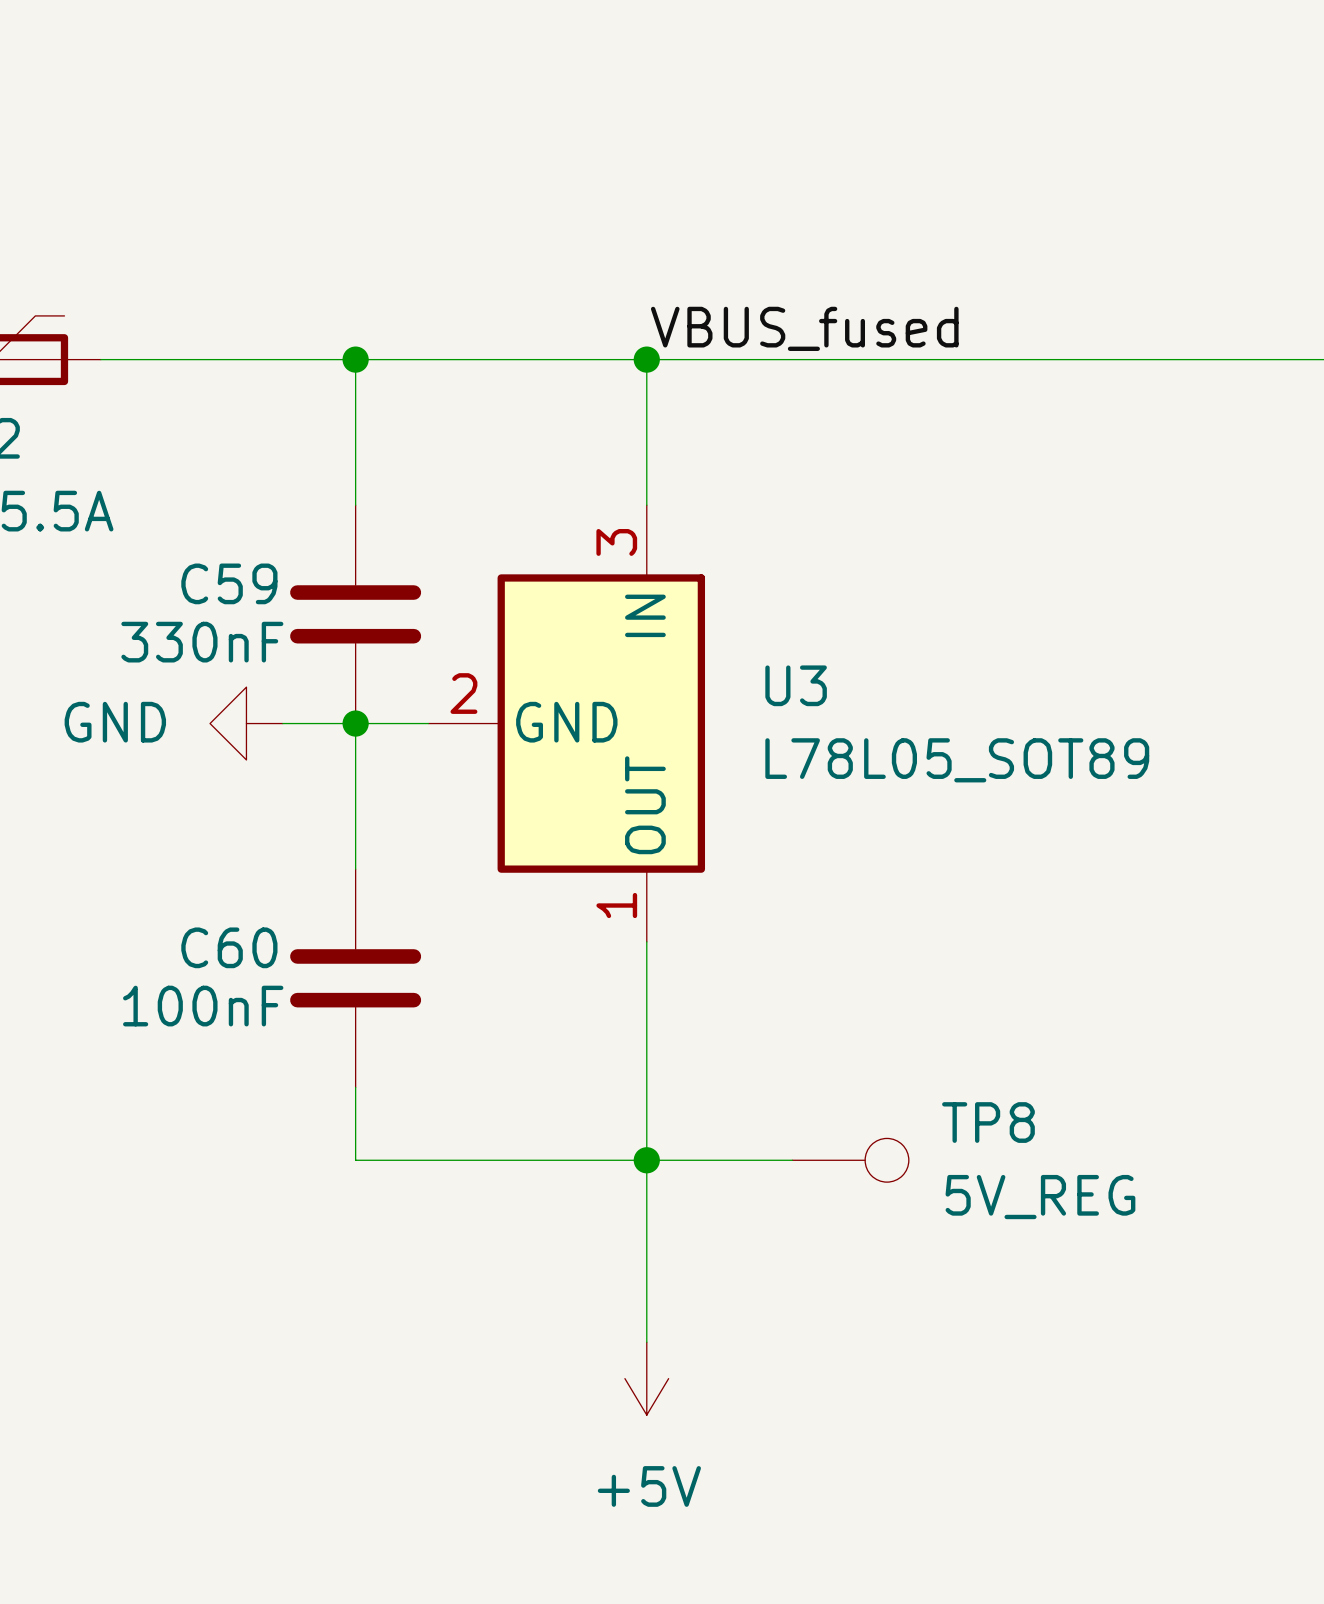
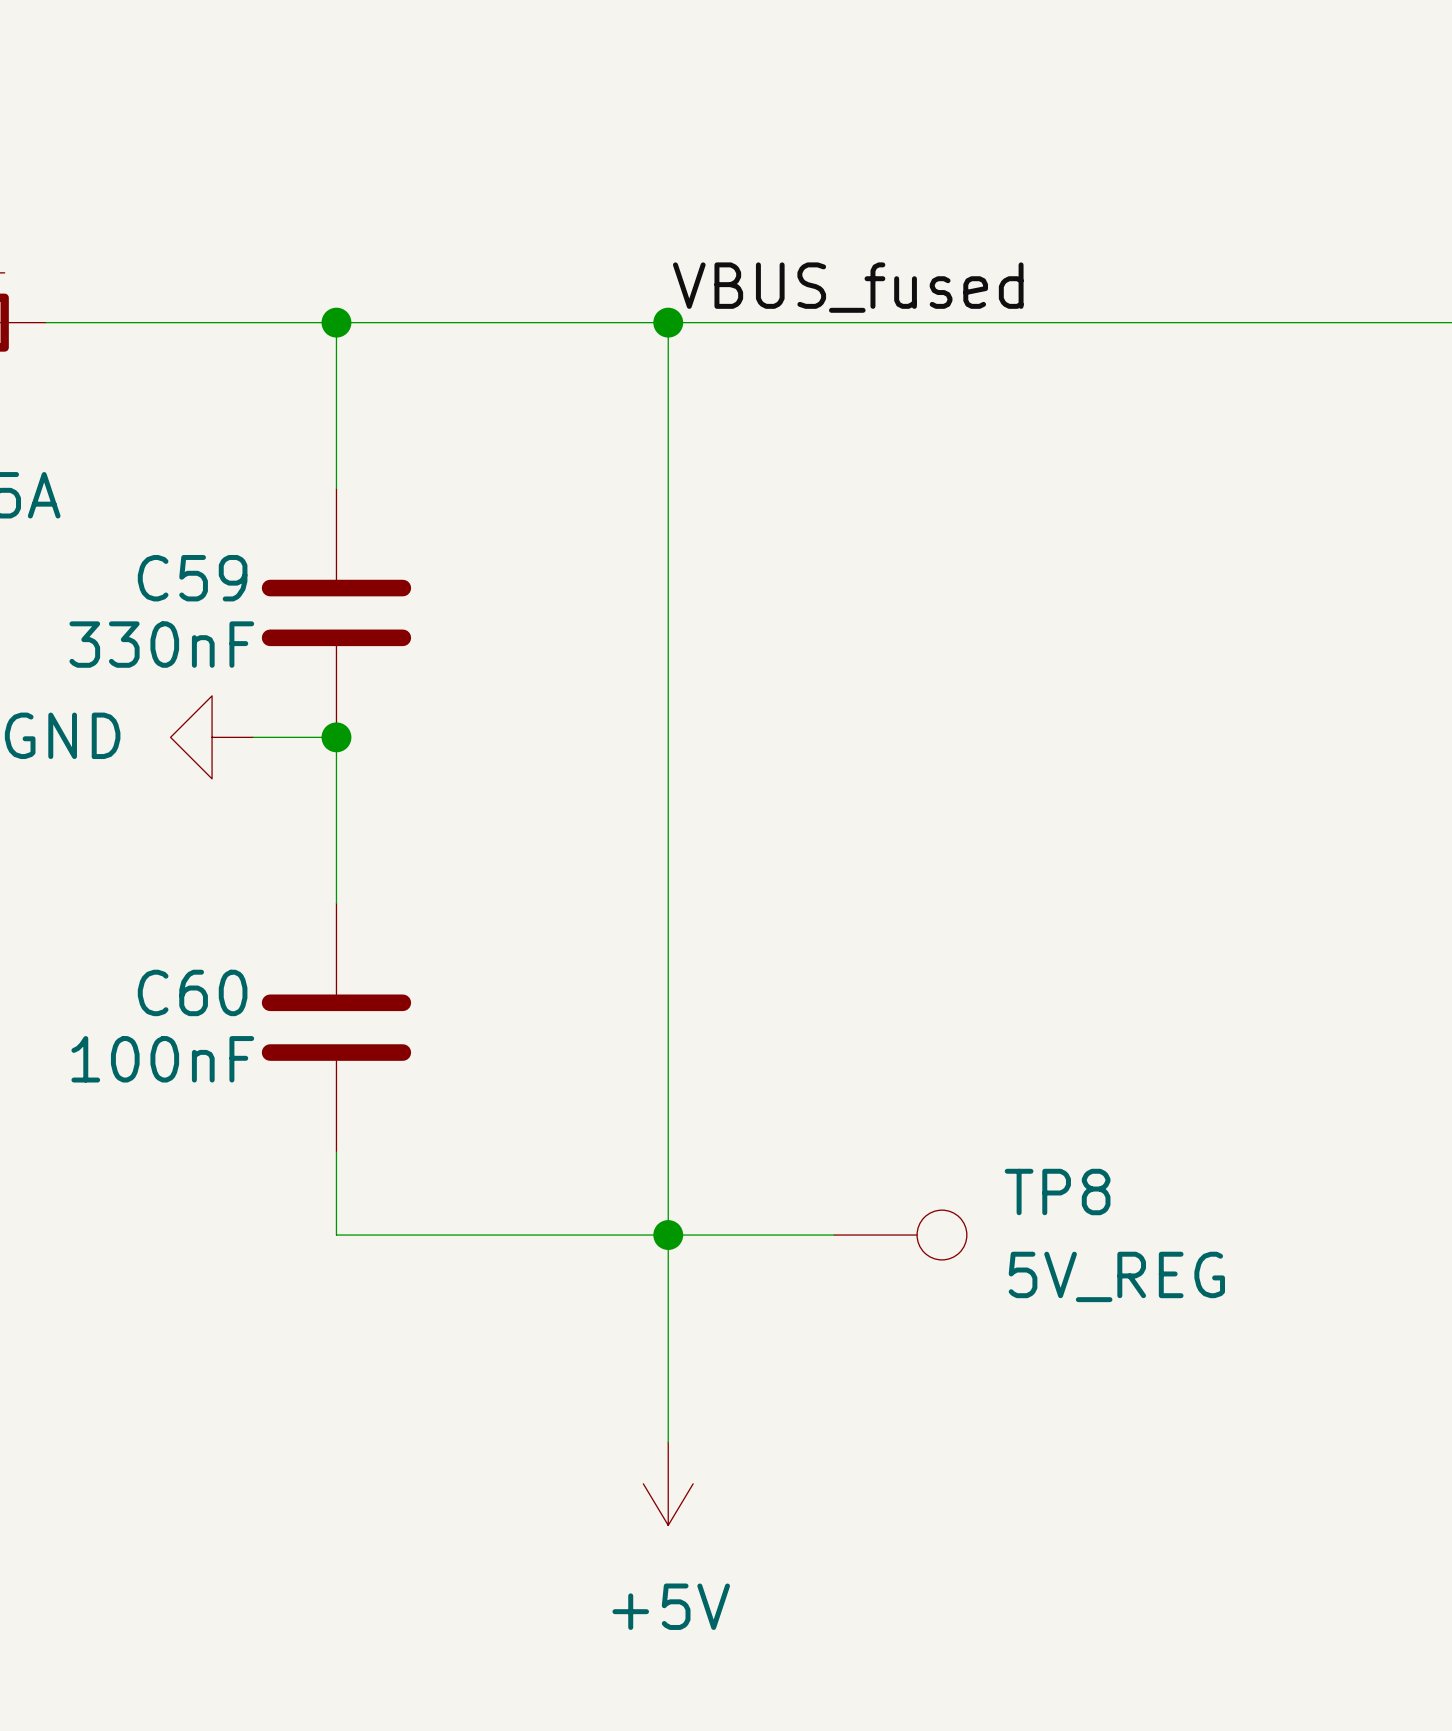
wire: (355, 723) (428, 723) -> none
U3: L78L05_SOT89 (566, 723) -> none

